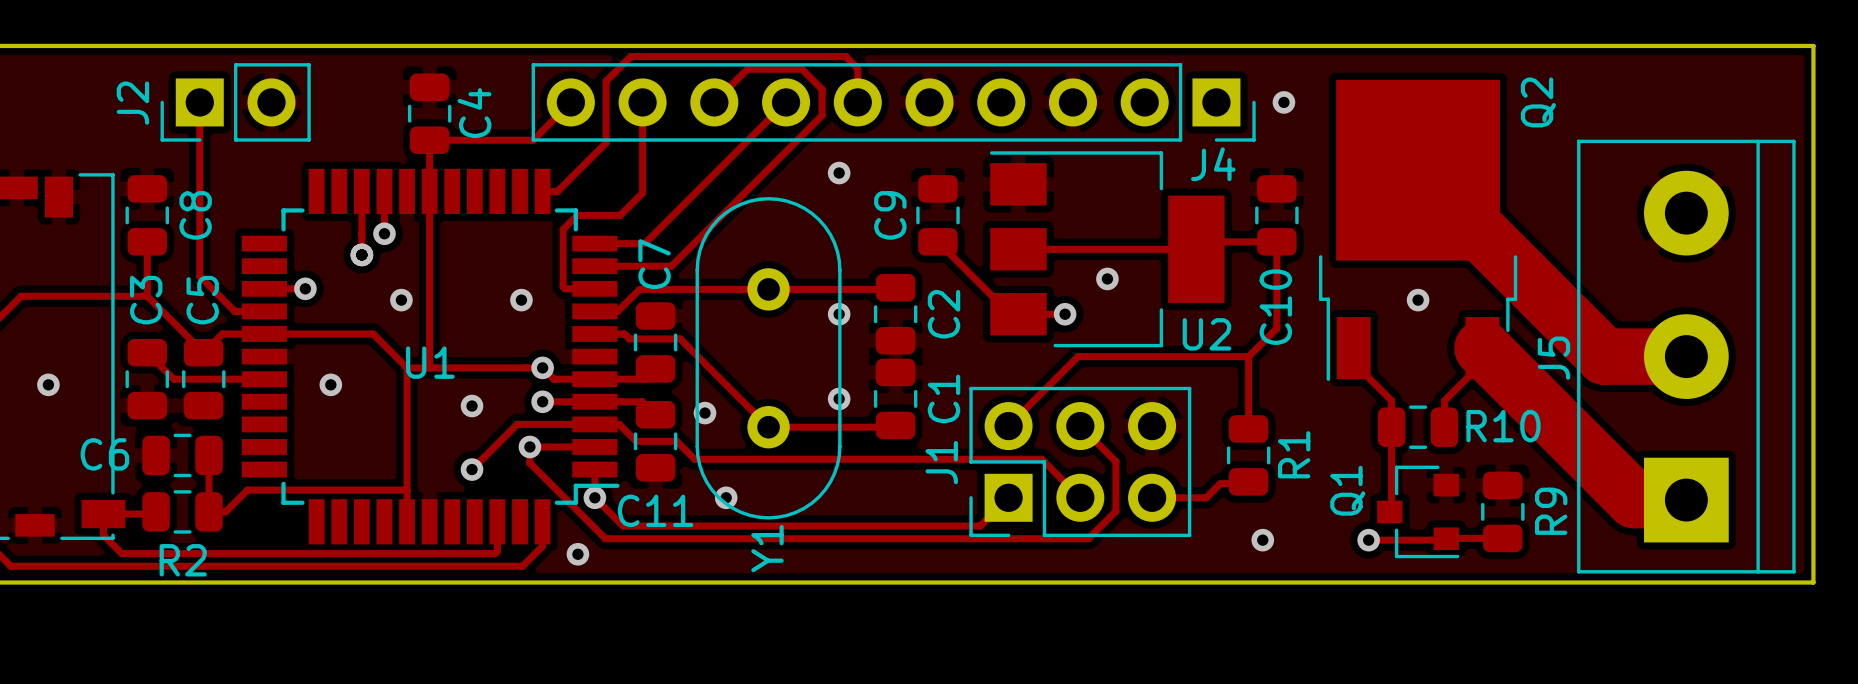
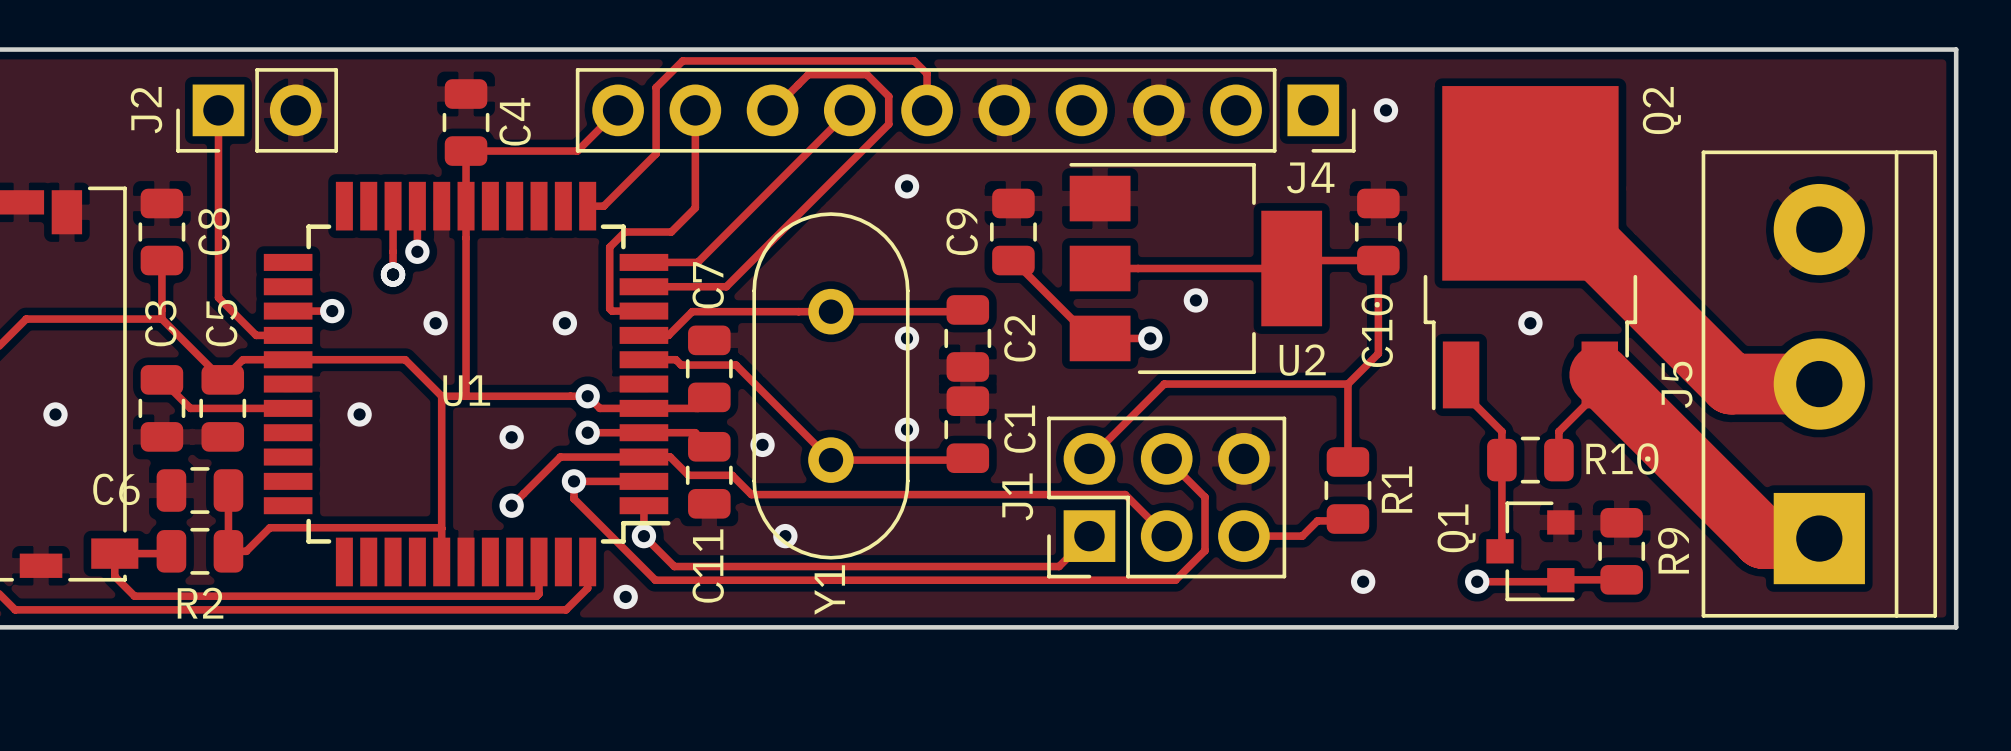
C11 name rotation: 0° (655, 510) -> 90° counterclockwise (708, 566)

